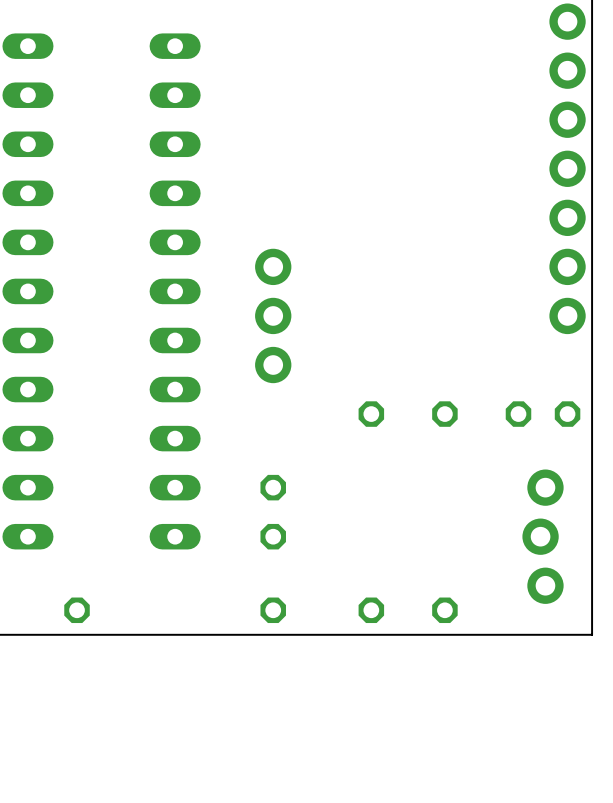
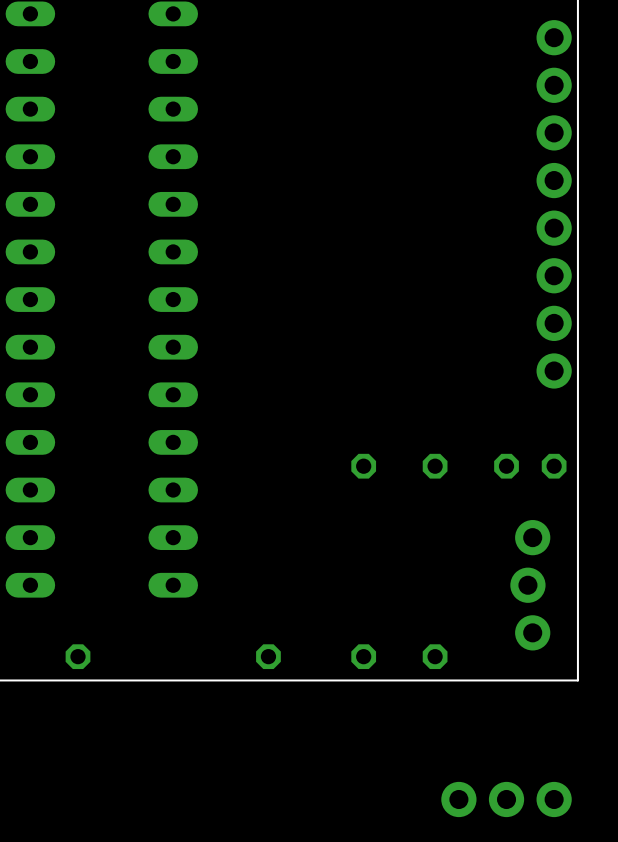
part: (273, 315) -> none
part: (273, 512) -> none
part: none -> (506, 799)

